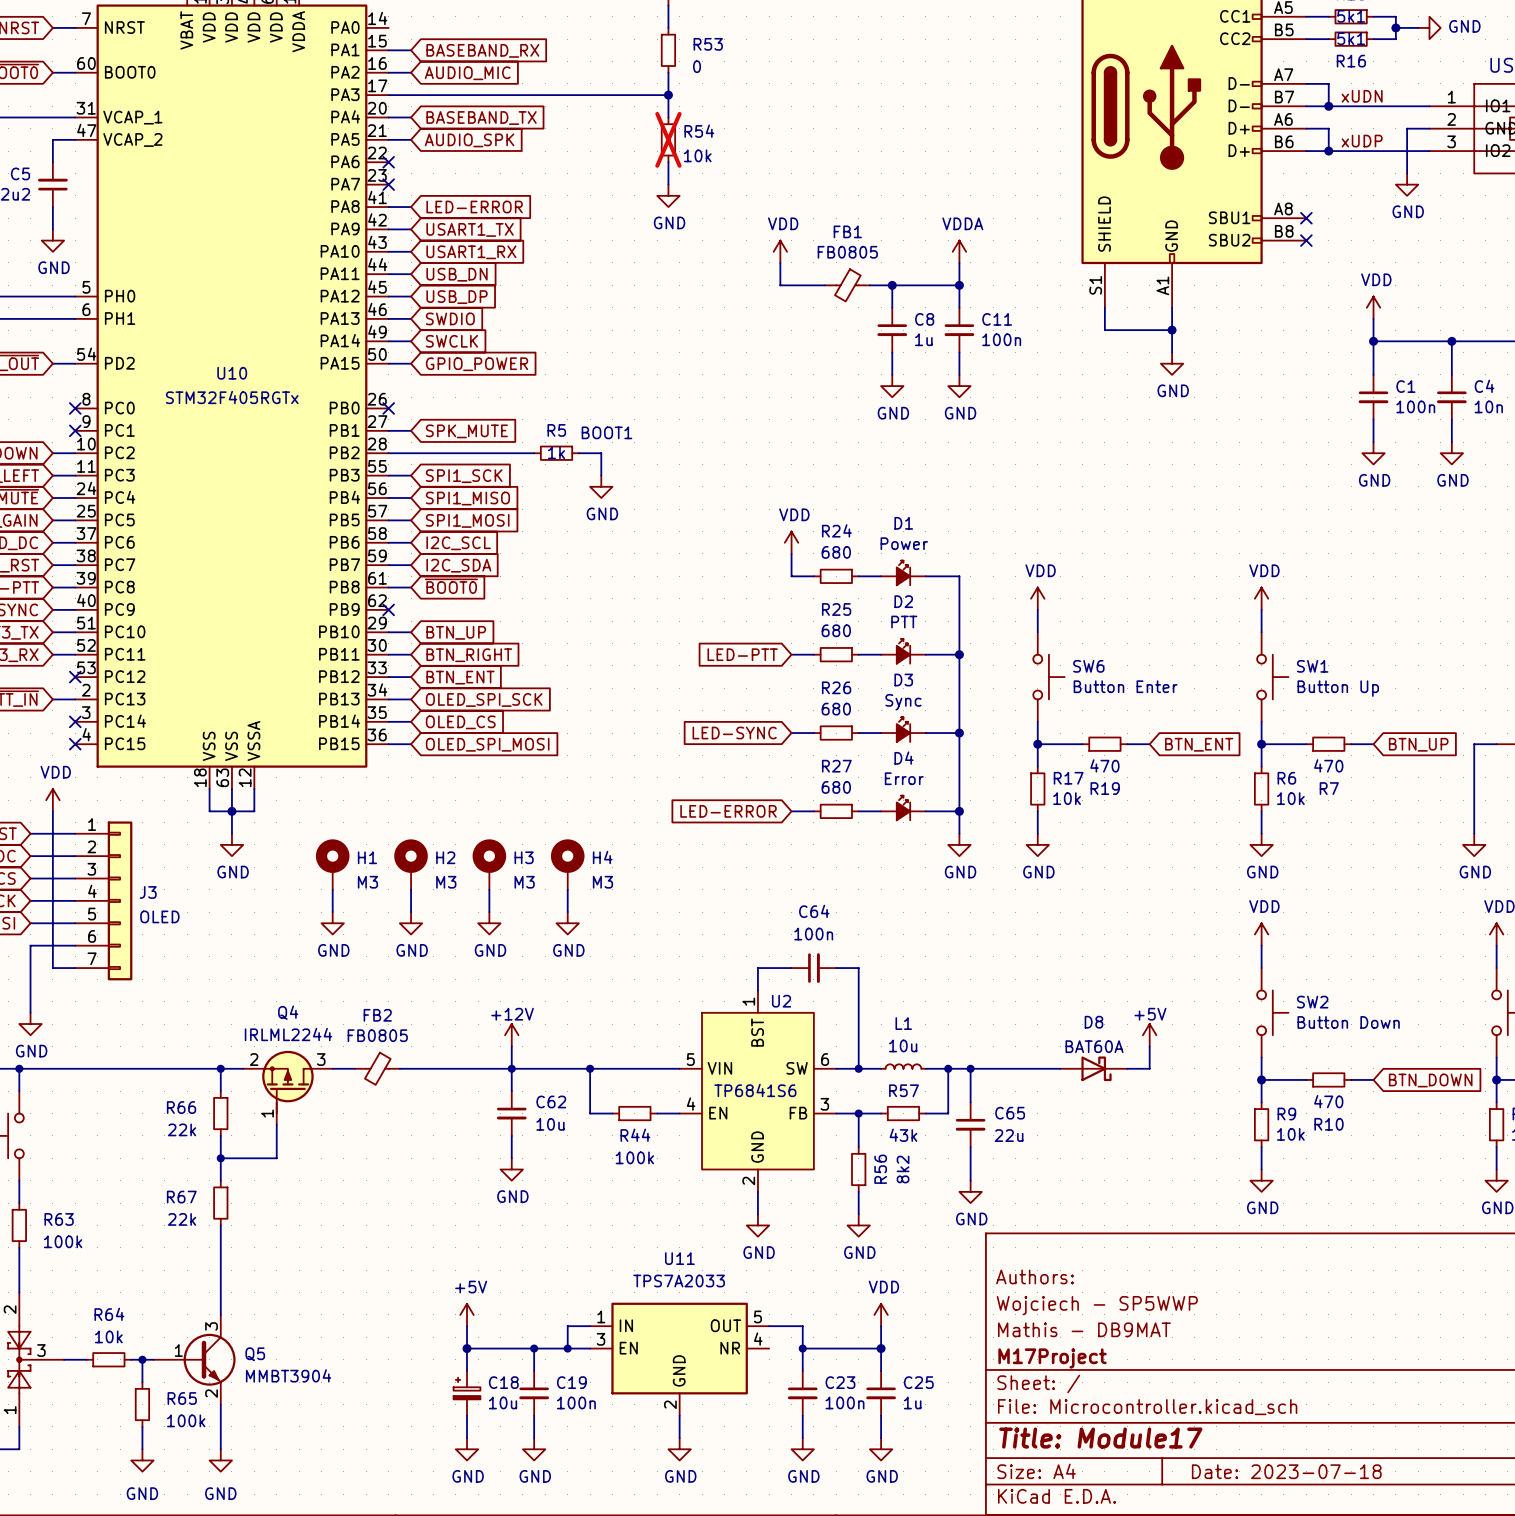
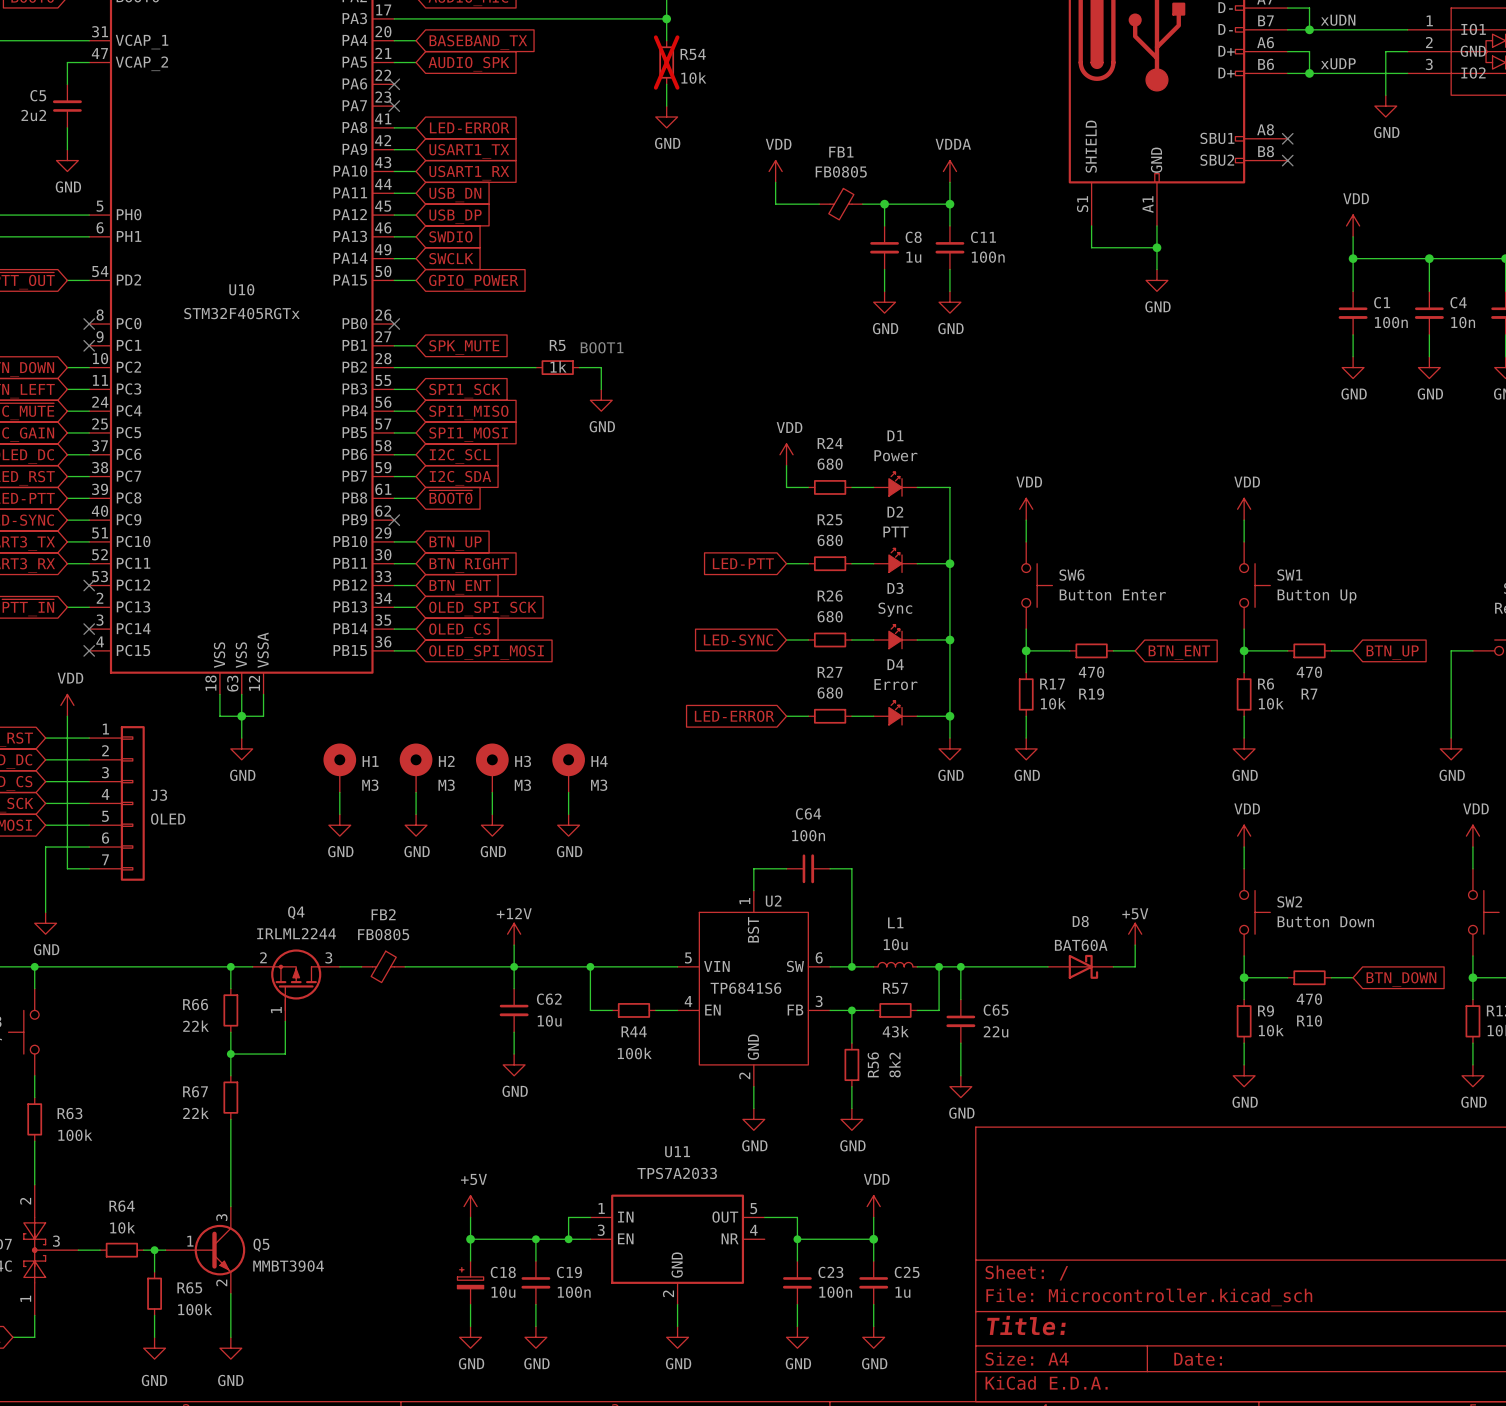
title block: Authors: (1034, 1276) -> none
title block: Wojciech - SP5WWP (1097, 1305) -> none
title block: Mathis - DB9MAT (1084, 1329) -> none
title block: M17Project (1052, 1358) -> none
title block: Title: Module17 (1100, 1438) -> Title: (1026, 1325)
title block: Date: 2023-07-18 (1286, 1471) -> Date: (1198, 1359)

